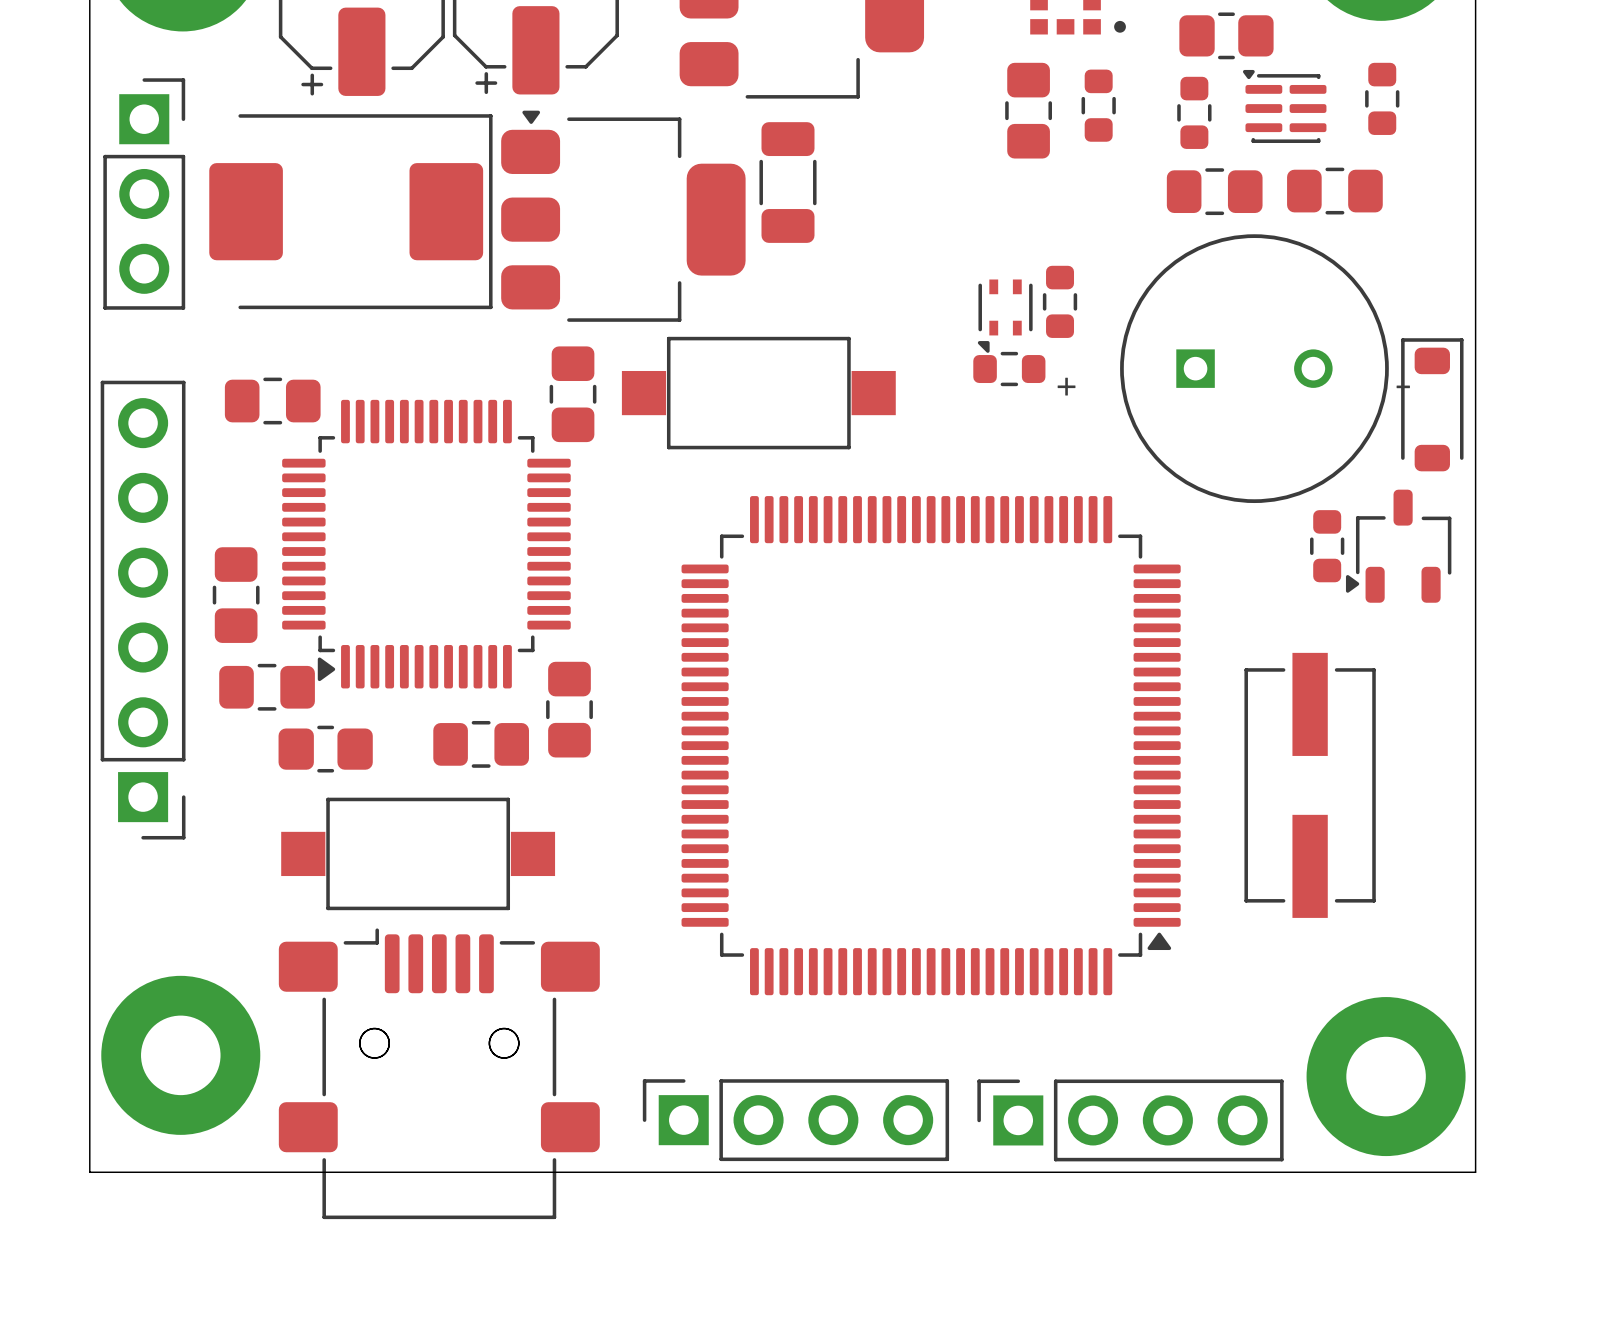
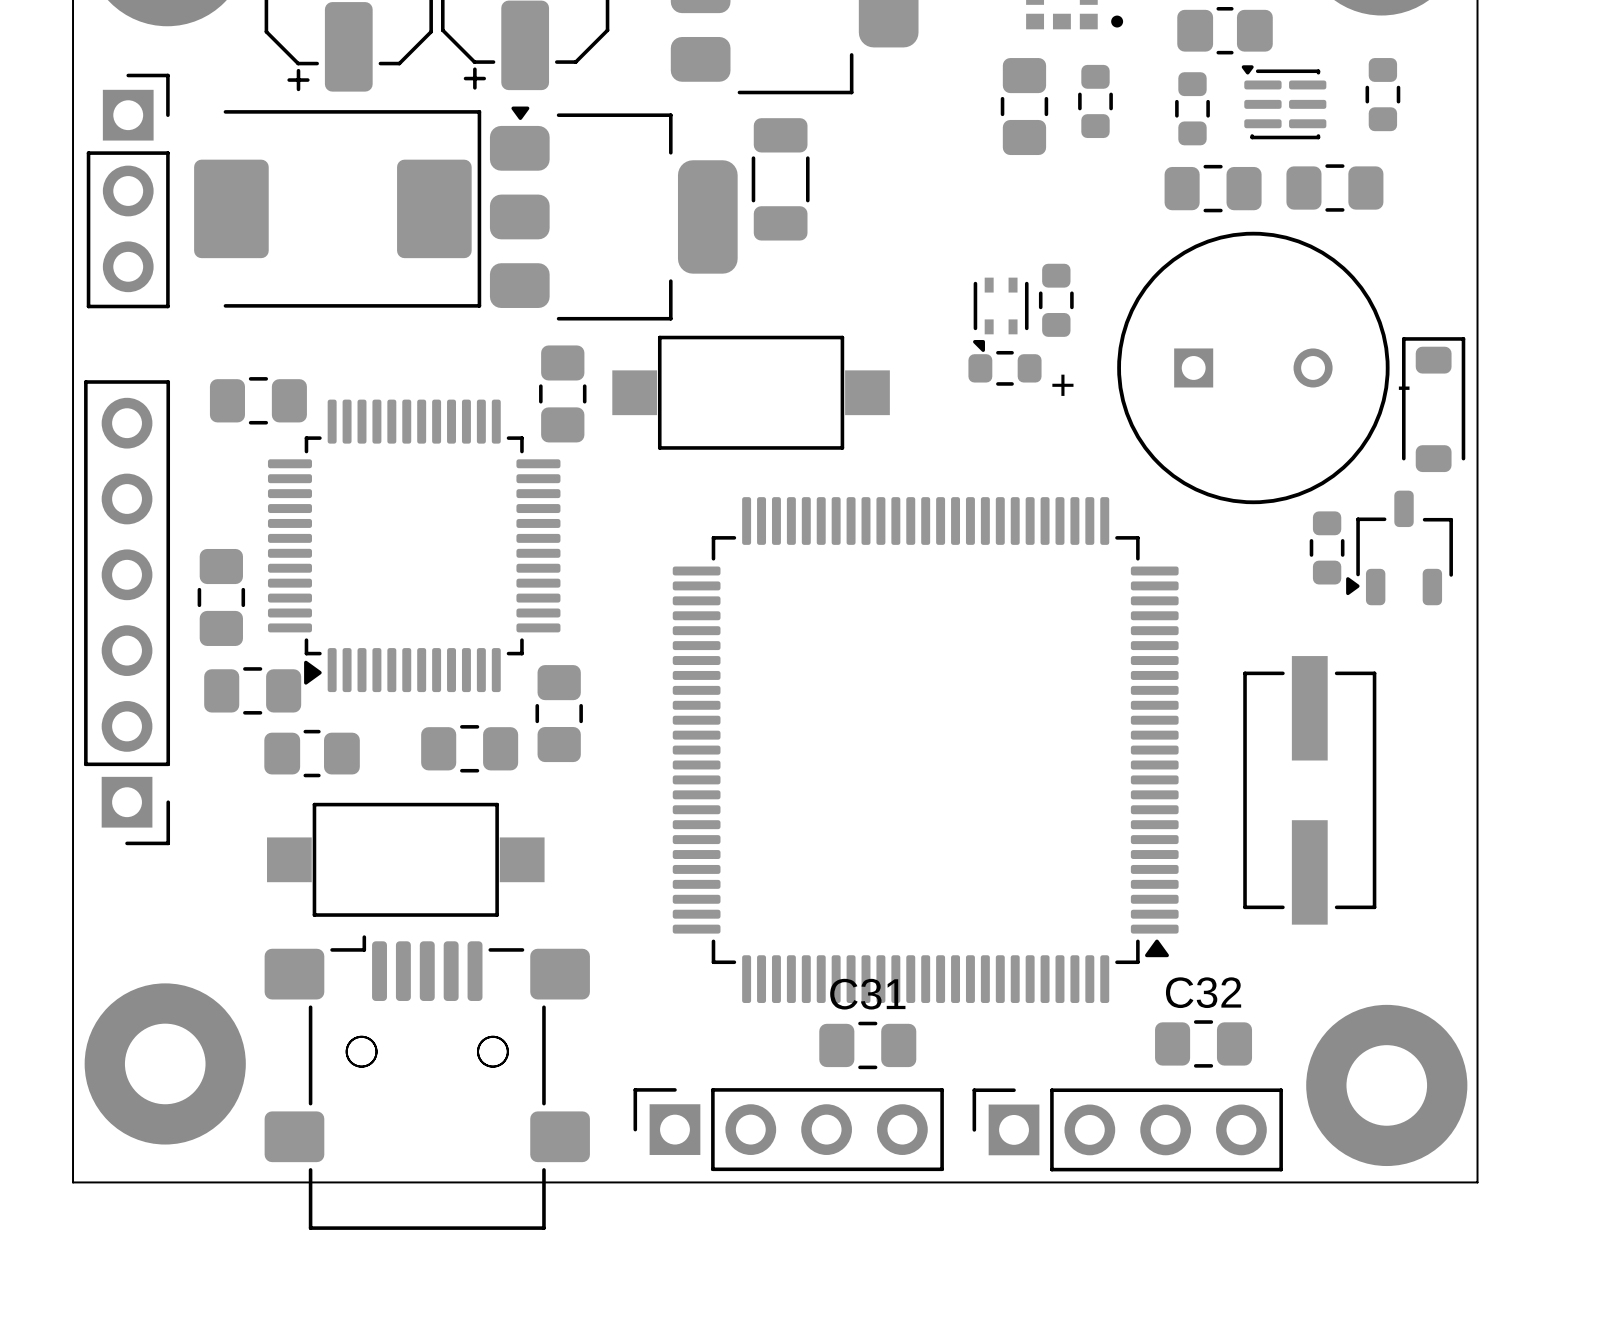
C32: none -> (1203, 1043)
C31: none -> (867, 1045)

